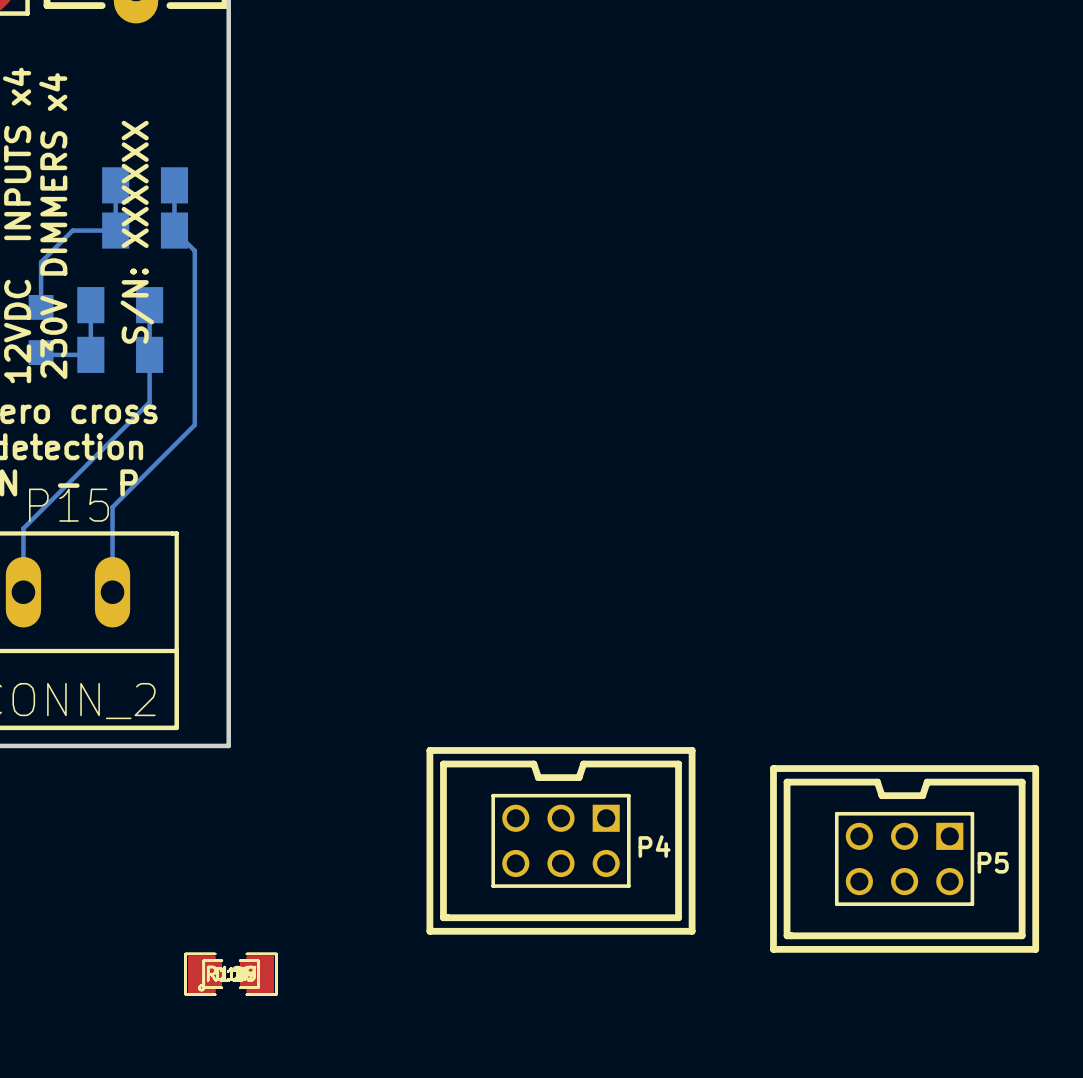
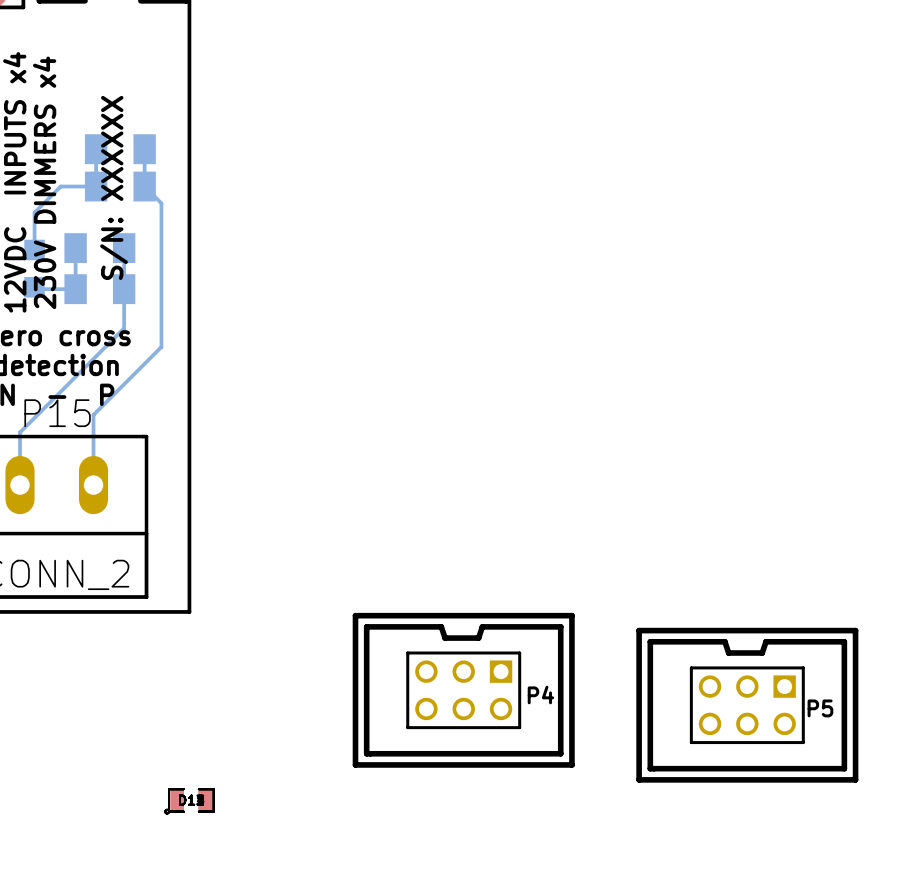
part: (231, 974) -> none
part: (231, 974) -> none
part: (231, 974) -> none
part: (231, 974) -> none

